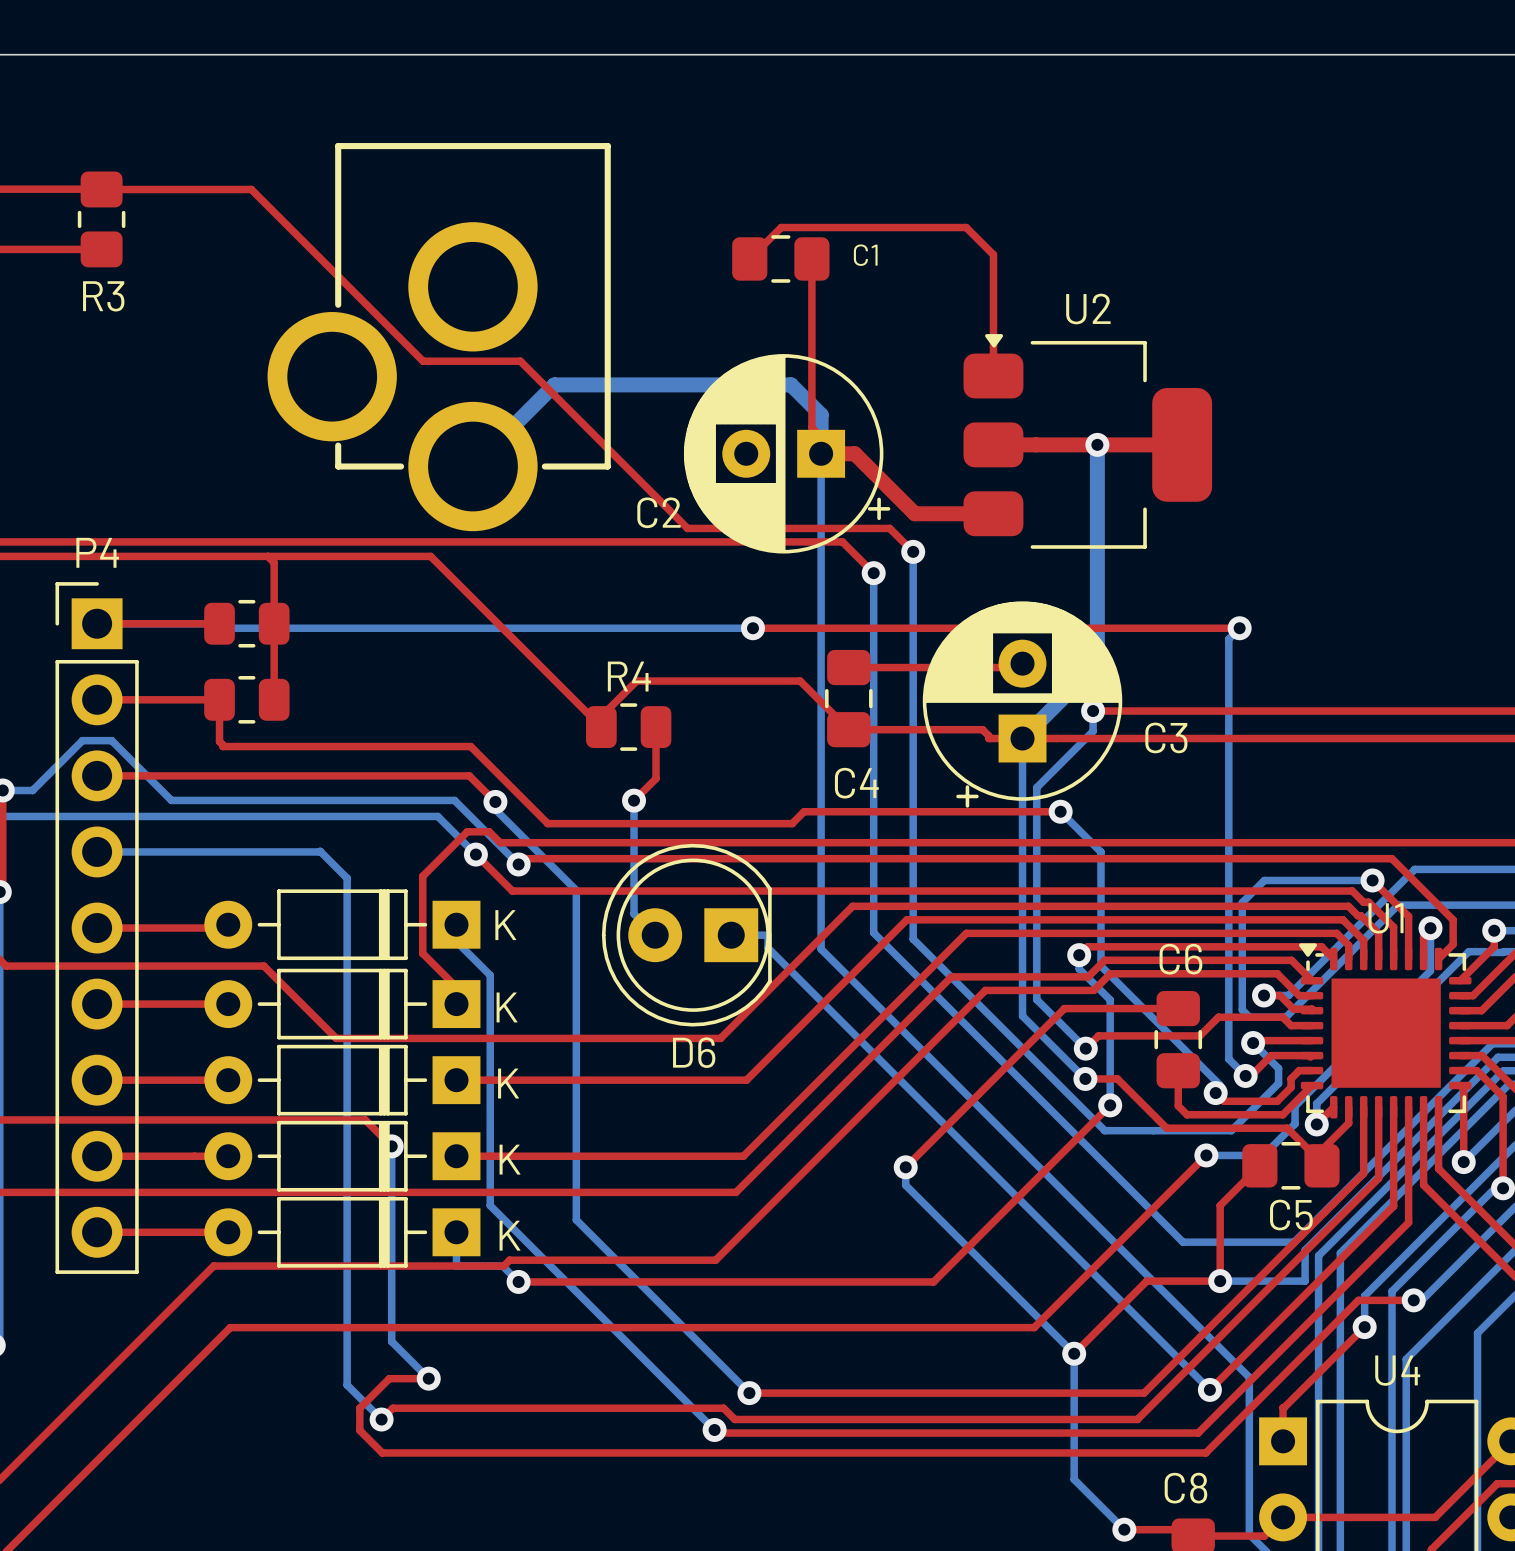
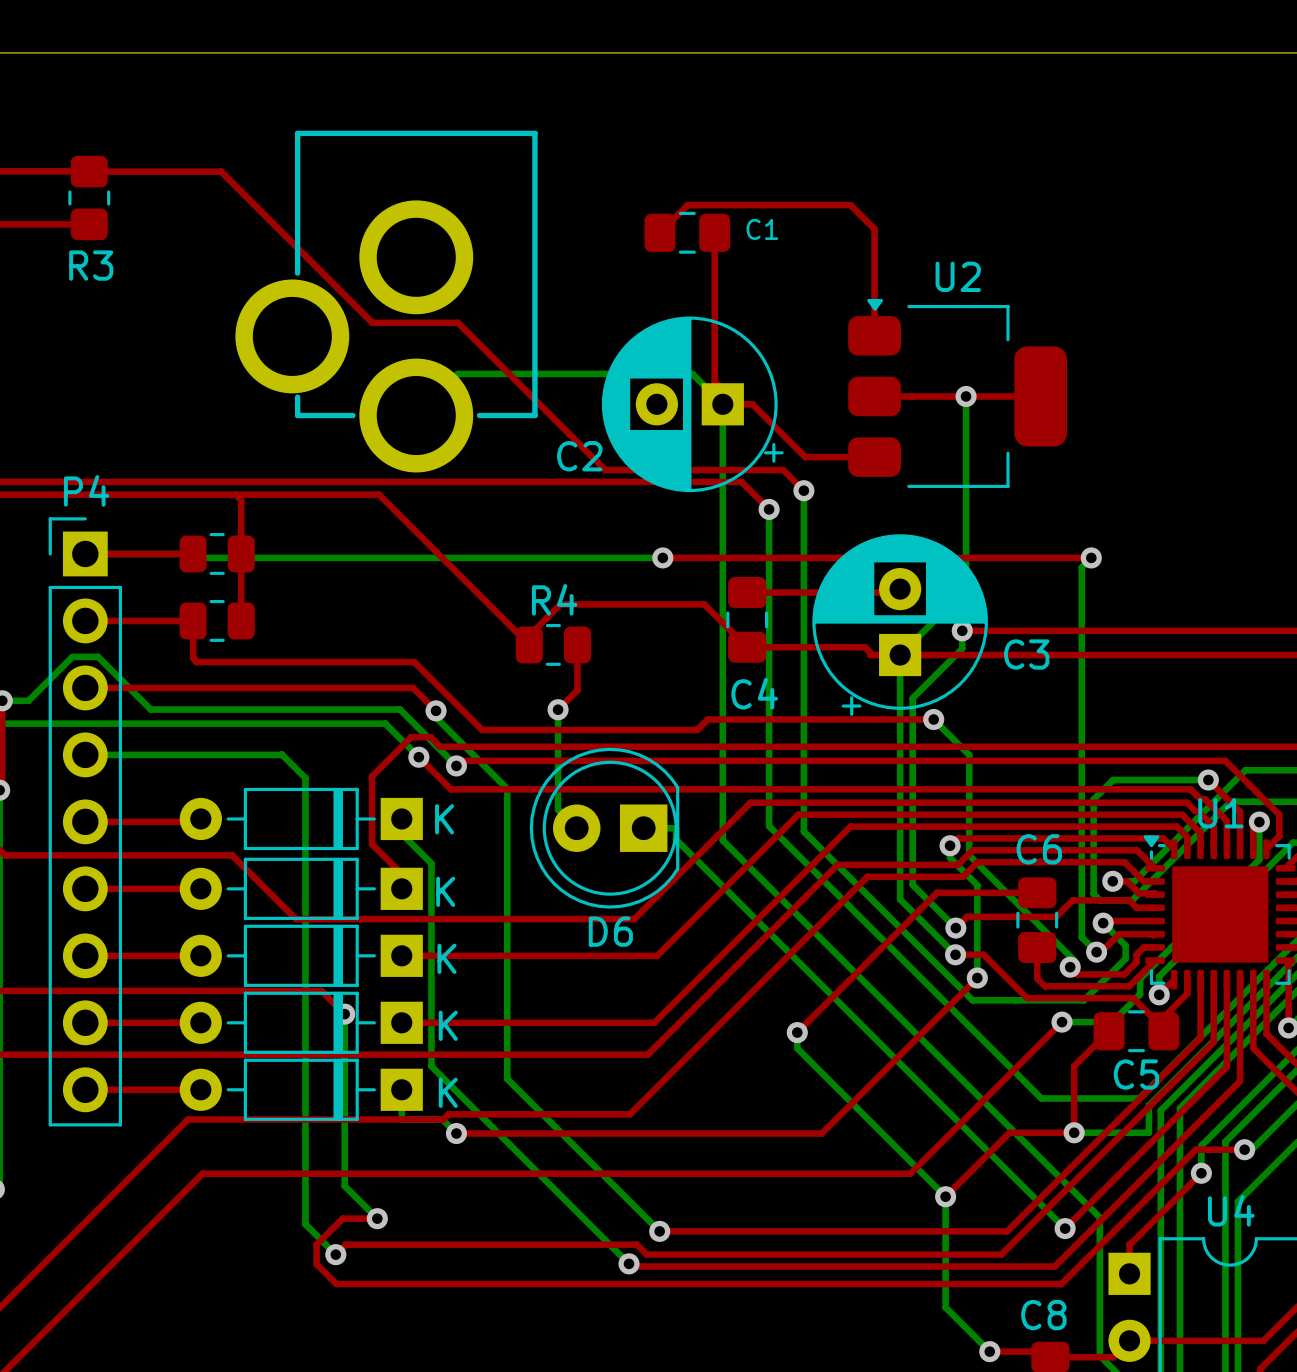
bottom track: (520, 419) (554, 384) (791, 384) (821, 414) (821, 453) -> (457, 373) (692, 373) (722, 404)
top track width: thick (993, 444) (1182, 444) -> thin (874, 396) (1040, 396)
bottom track width: thick (1097, 444) (1097, 663) (1022, 738) -> thin (966, 396) (966, 589) (900, 655)
top track width: thick (837, 453) (854, 453) (914, 513) (993, 513) -> thin (737, 404) (752, 404) (805, 457) (874, 457)

